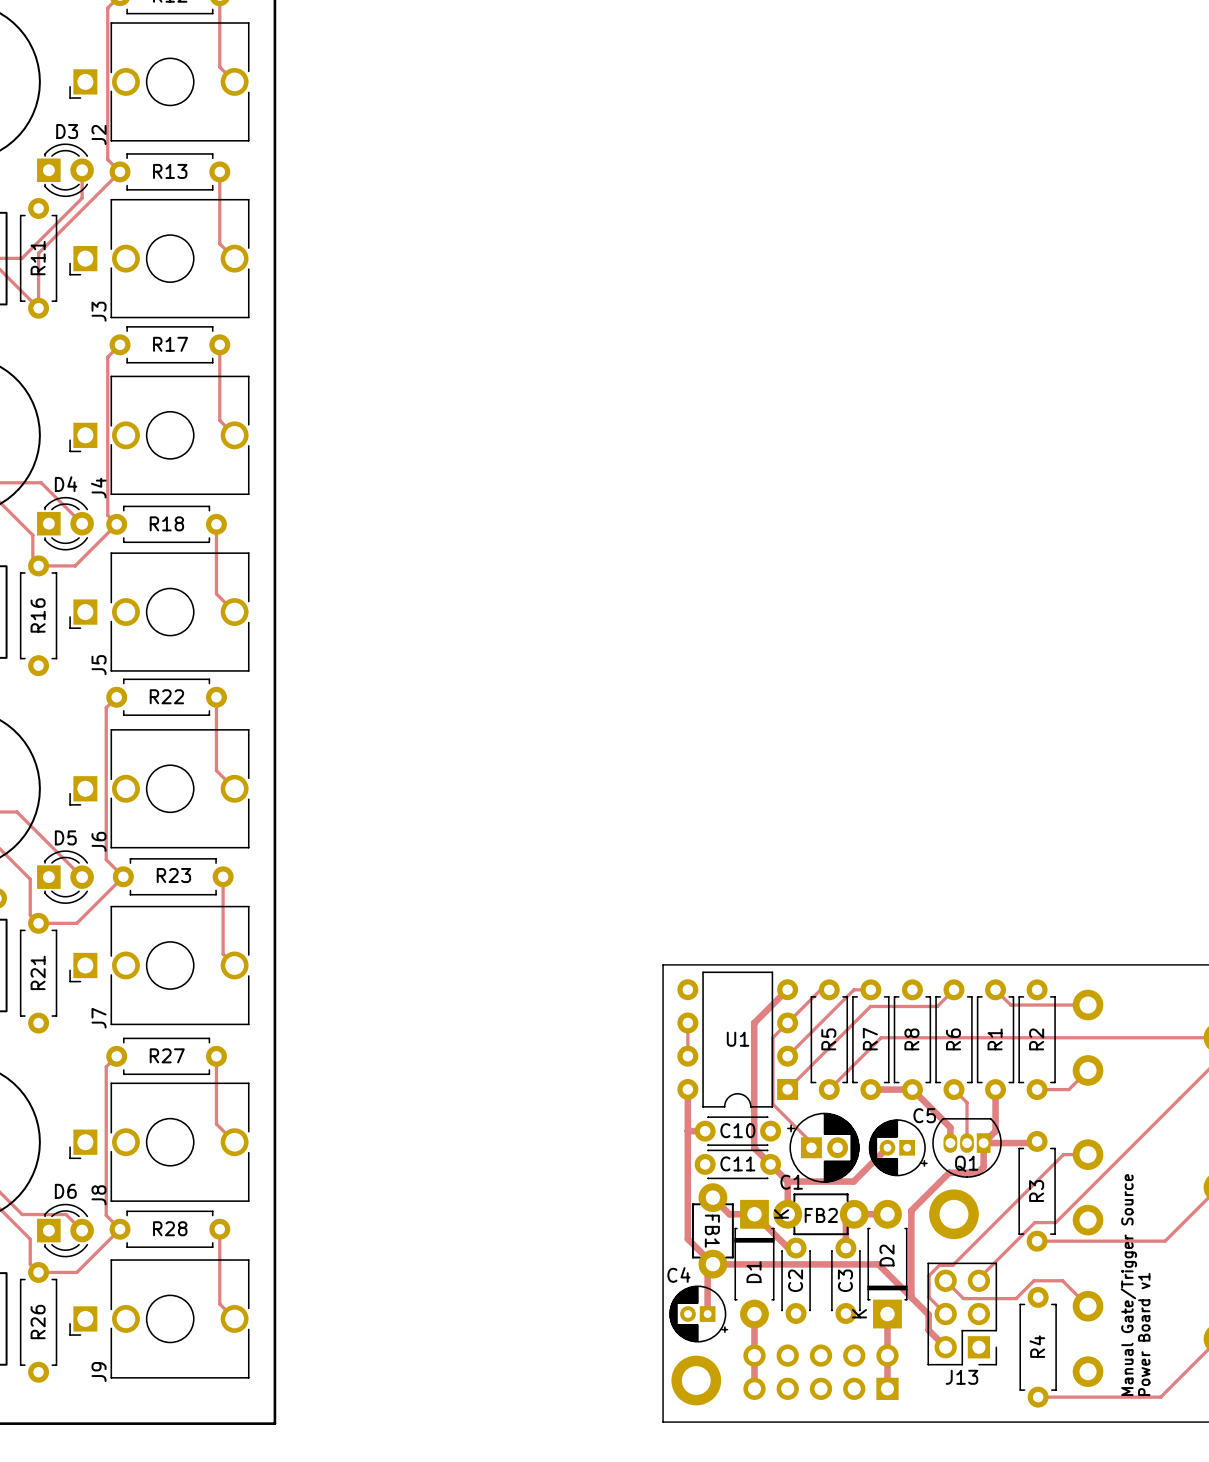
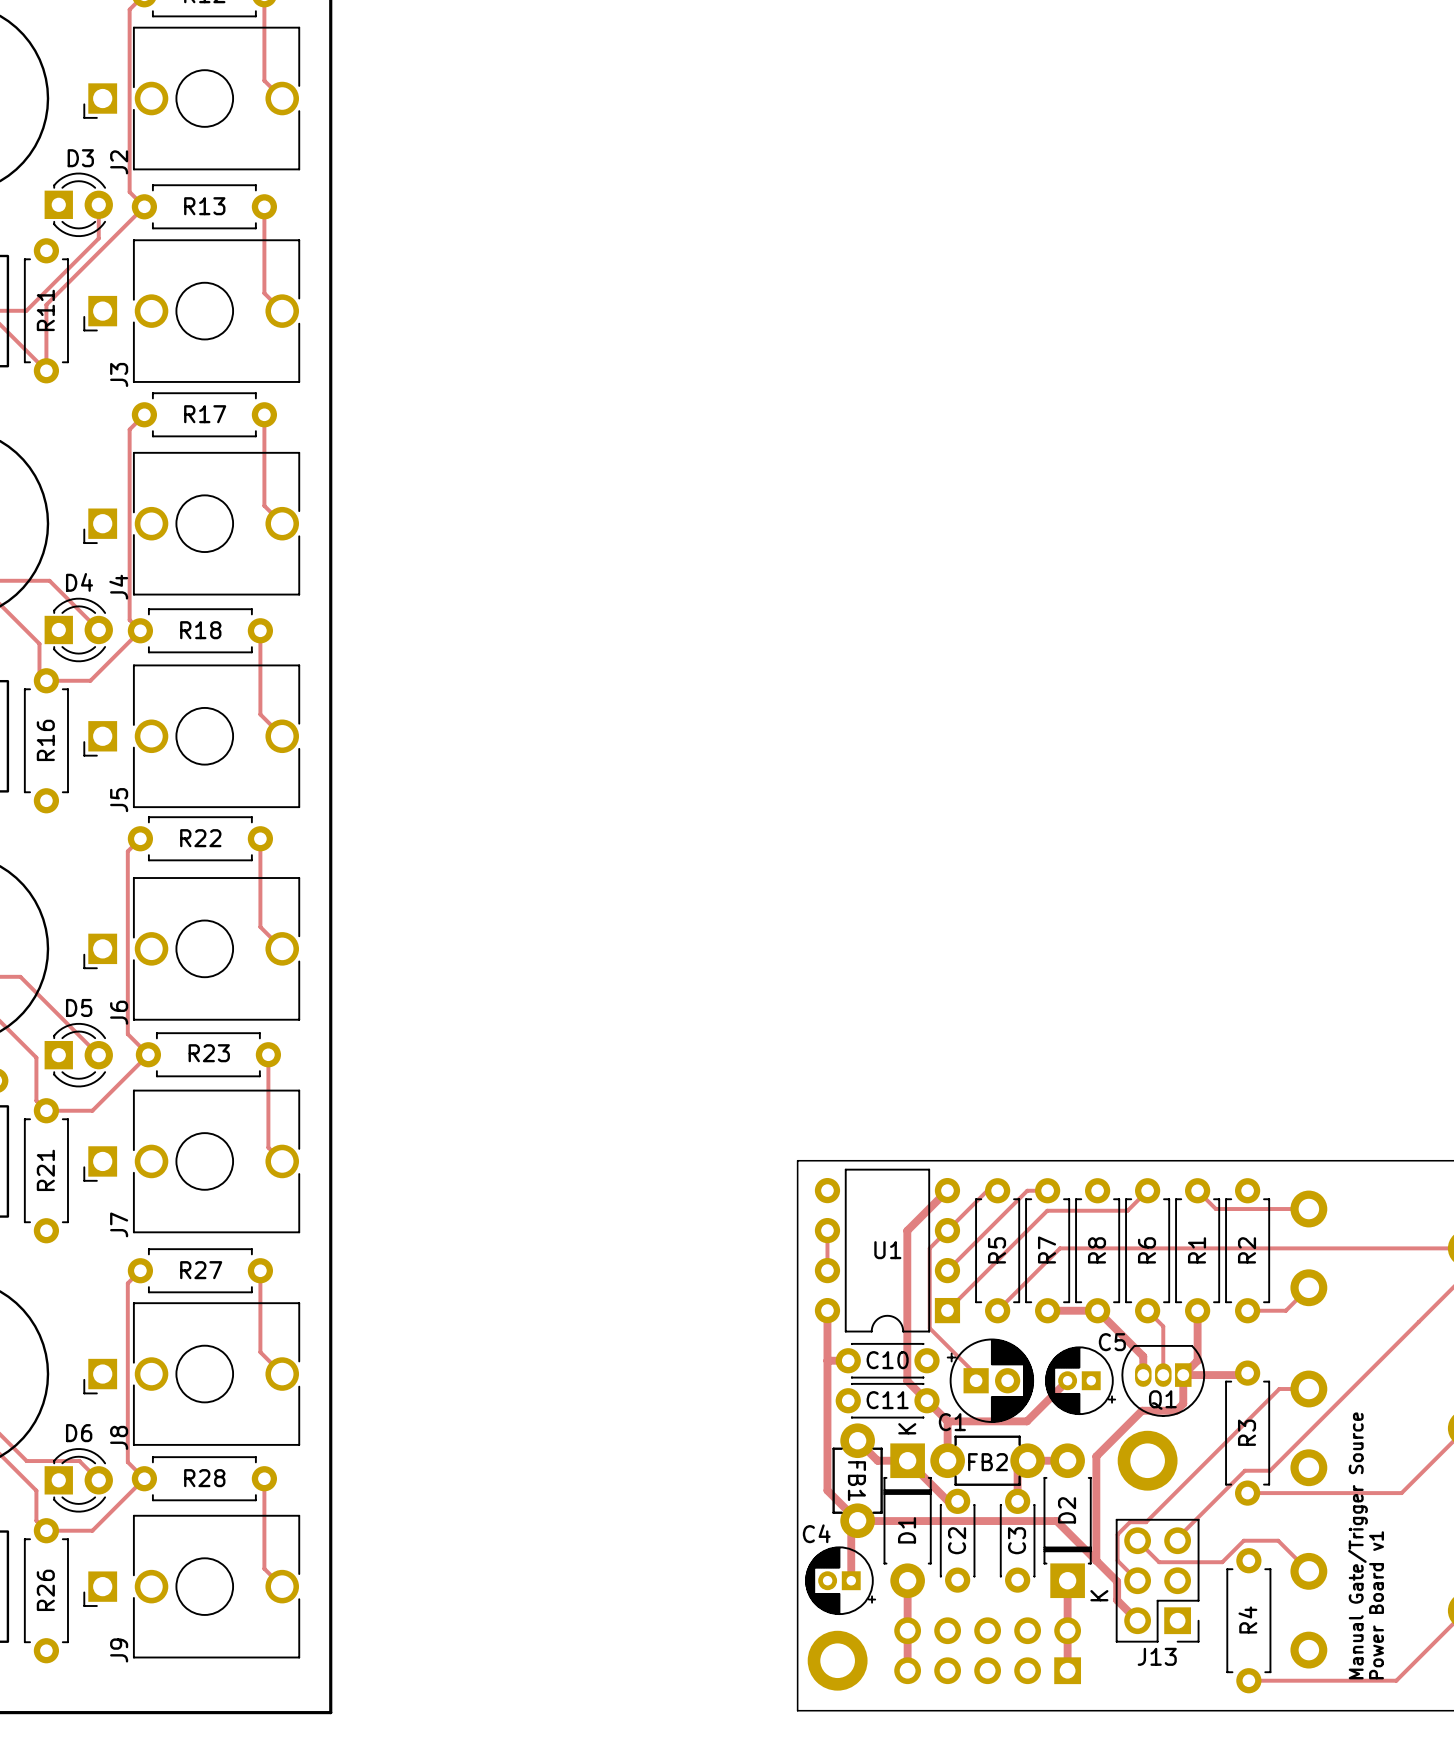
D1 text position: K (781, 1213) -> K (907, 1428)
D2 text position: K (859, 1313) -> K (1099, 1595)

